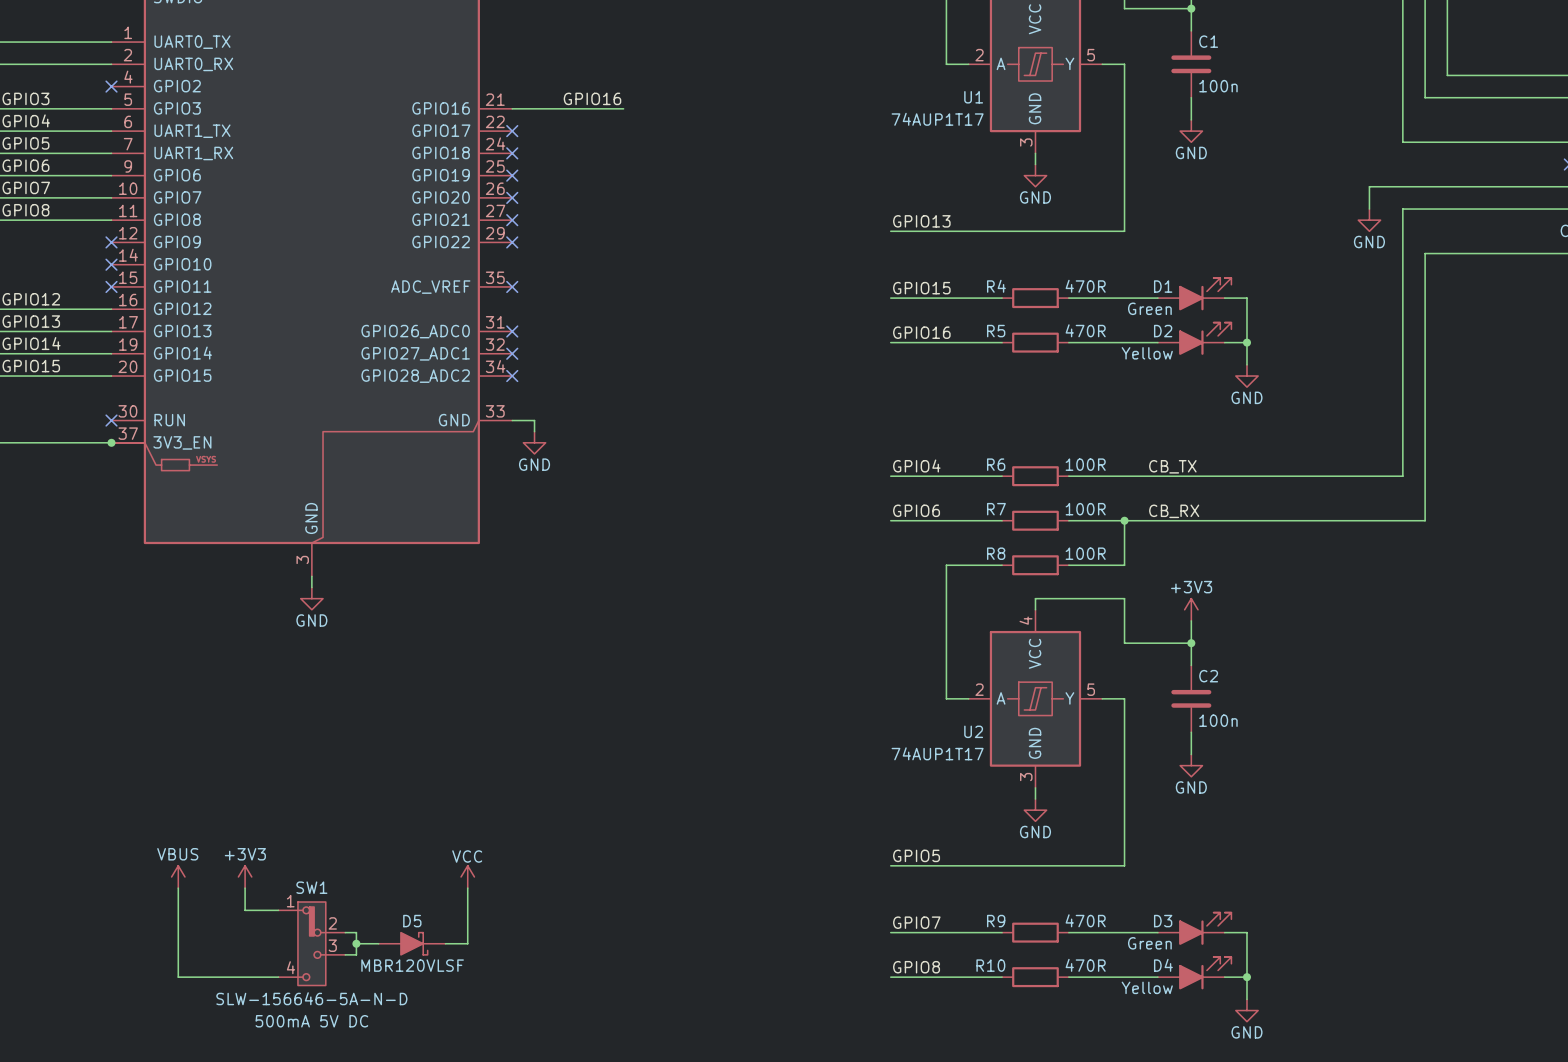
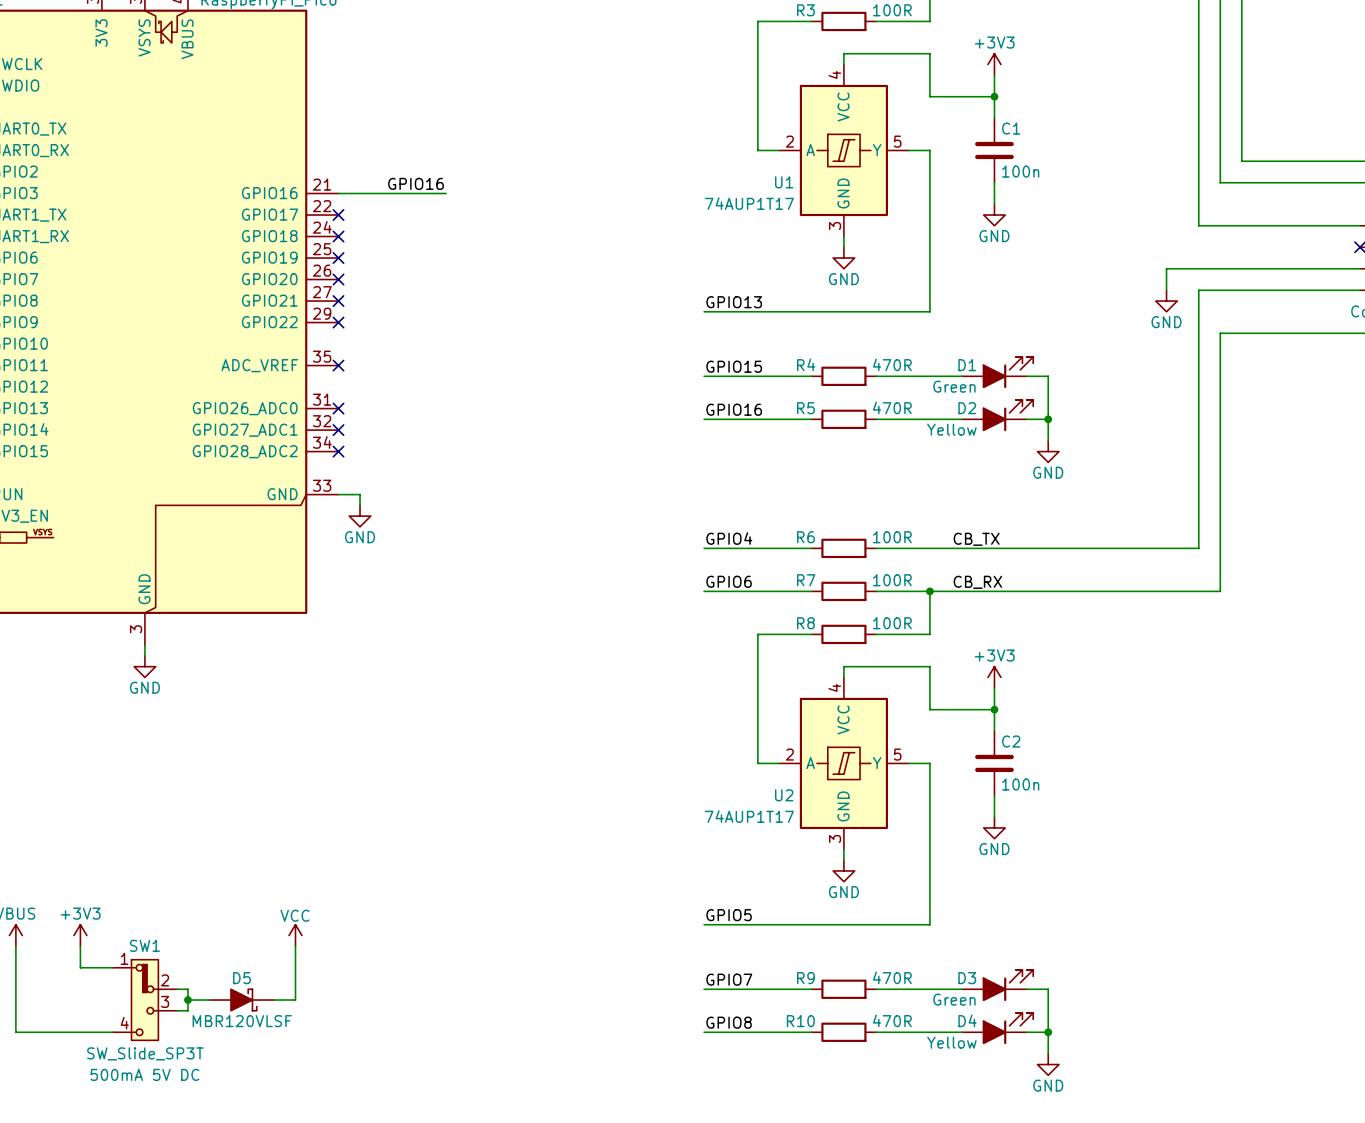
SW1 value: SLW-156646-5A-N-D (311, 998) -> SW_Slide_SP3T (145, 1053)

